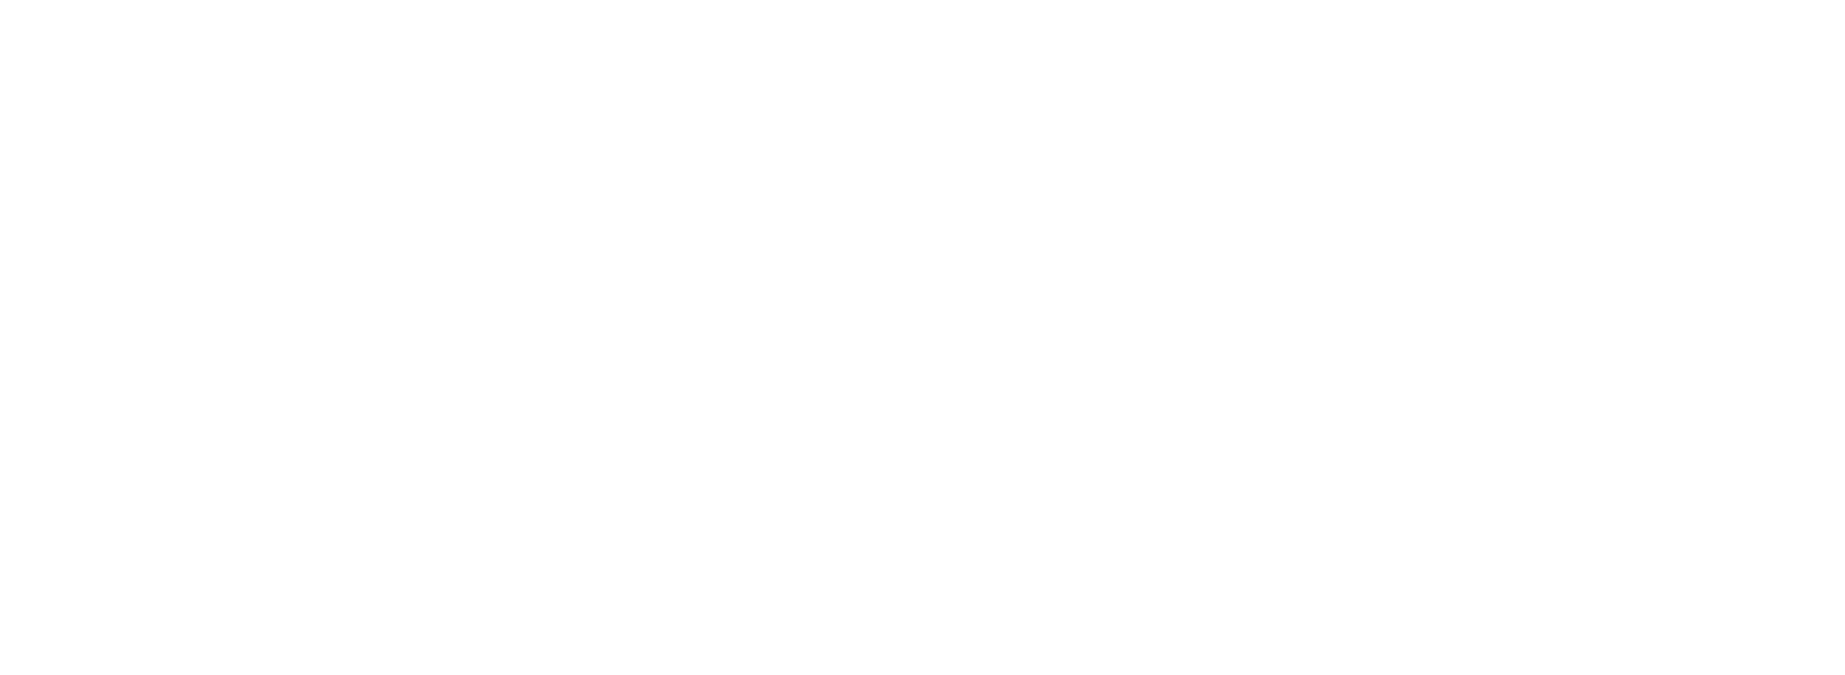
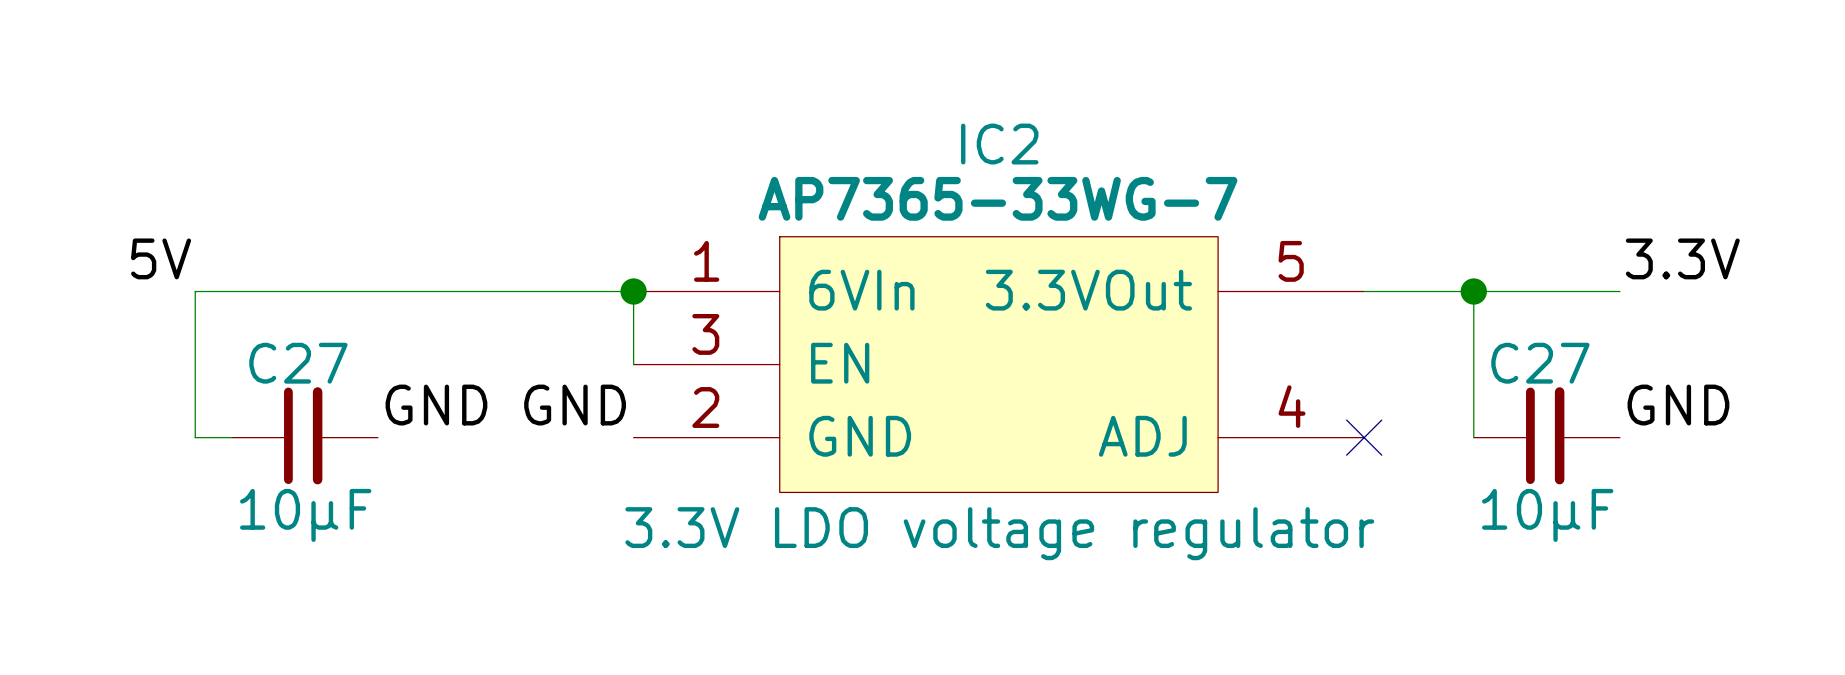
label: none -> 5V (161, 258)
label: none -> 3.3V (1682, 258)
junction: none -> (633, 291)
wire: none -> (1364, 291) (1619, 291)
wire: none -> (1473, 291) (1473, 437)
junction: none -> (1473, 291)
wire: none -> (633, 364) (633, 291) (195, 291) (195, 437) (231, 437)
IC2: none -> AP7365-33WG-7 (998, 364)
label: none -> GND (436, 405)
label: none -> GND (575, 405)
label: none -> GND (1678, 405)
C27: none -> 10μF (304, 435)
C27: none -> 10μF (1546, 435)
no-connect mark: none -> (1364, 437)

